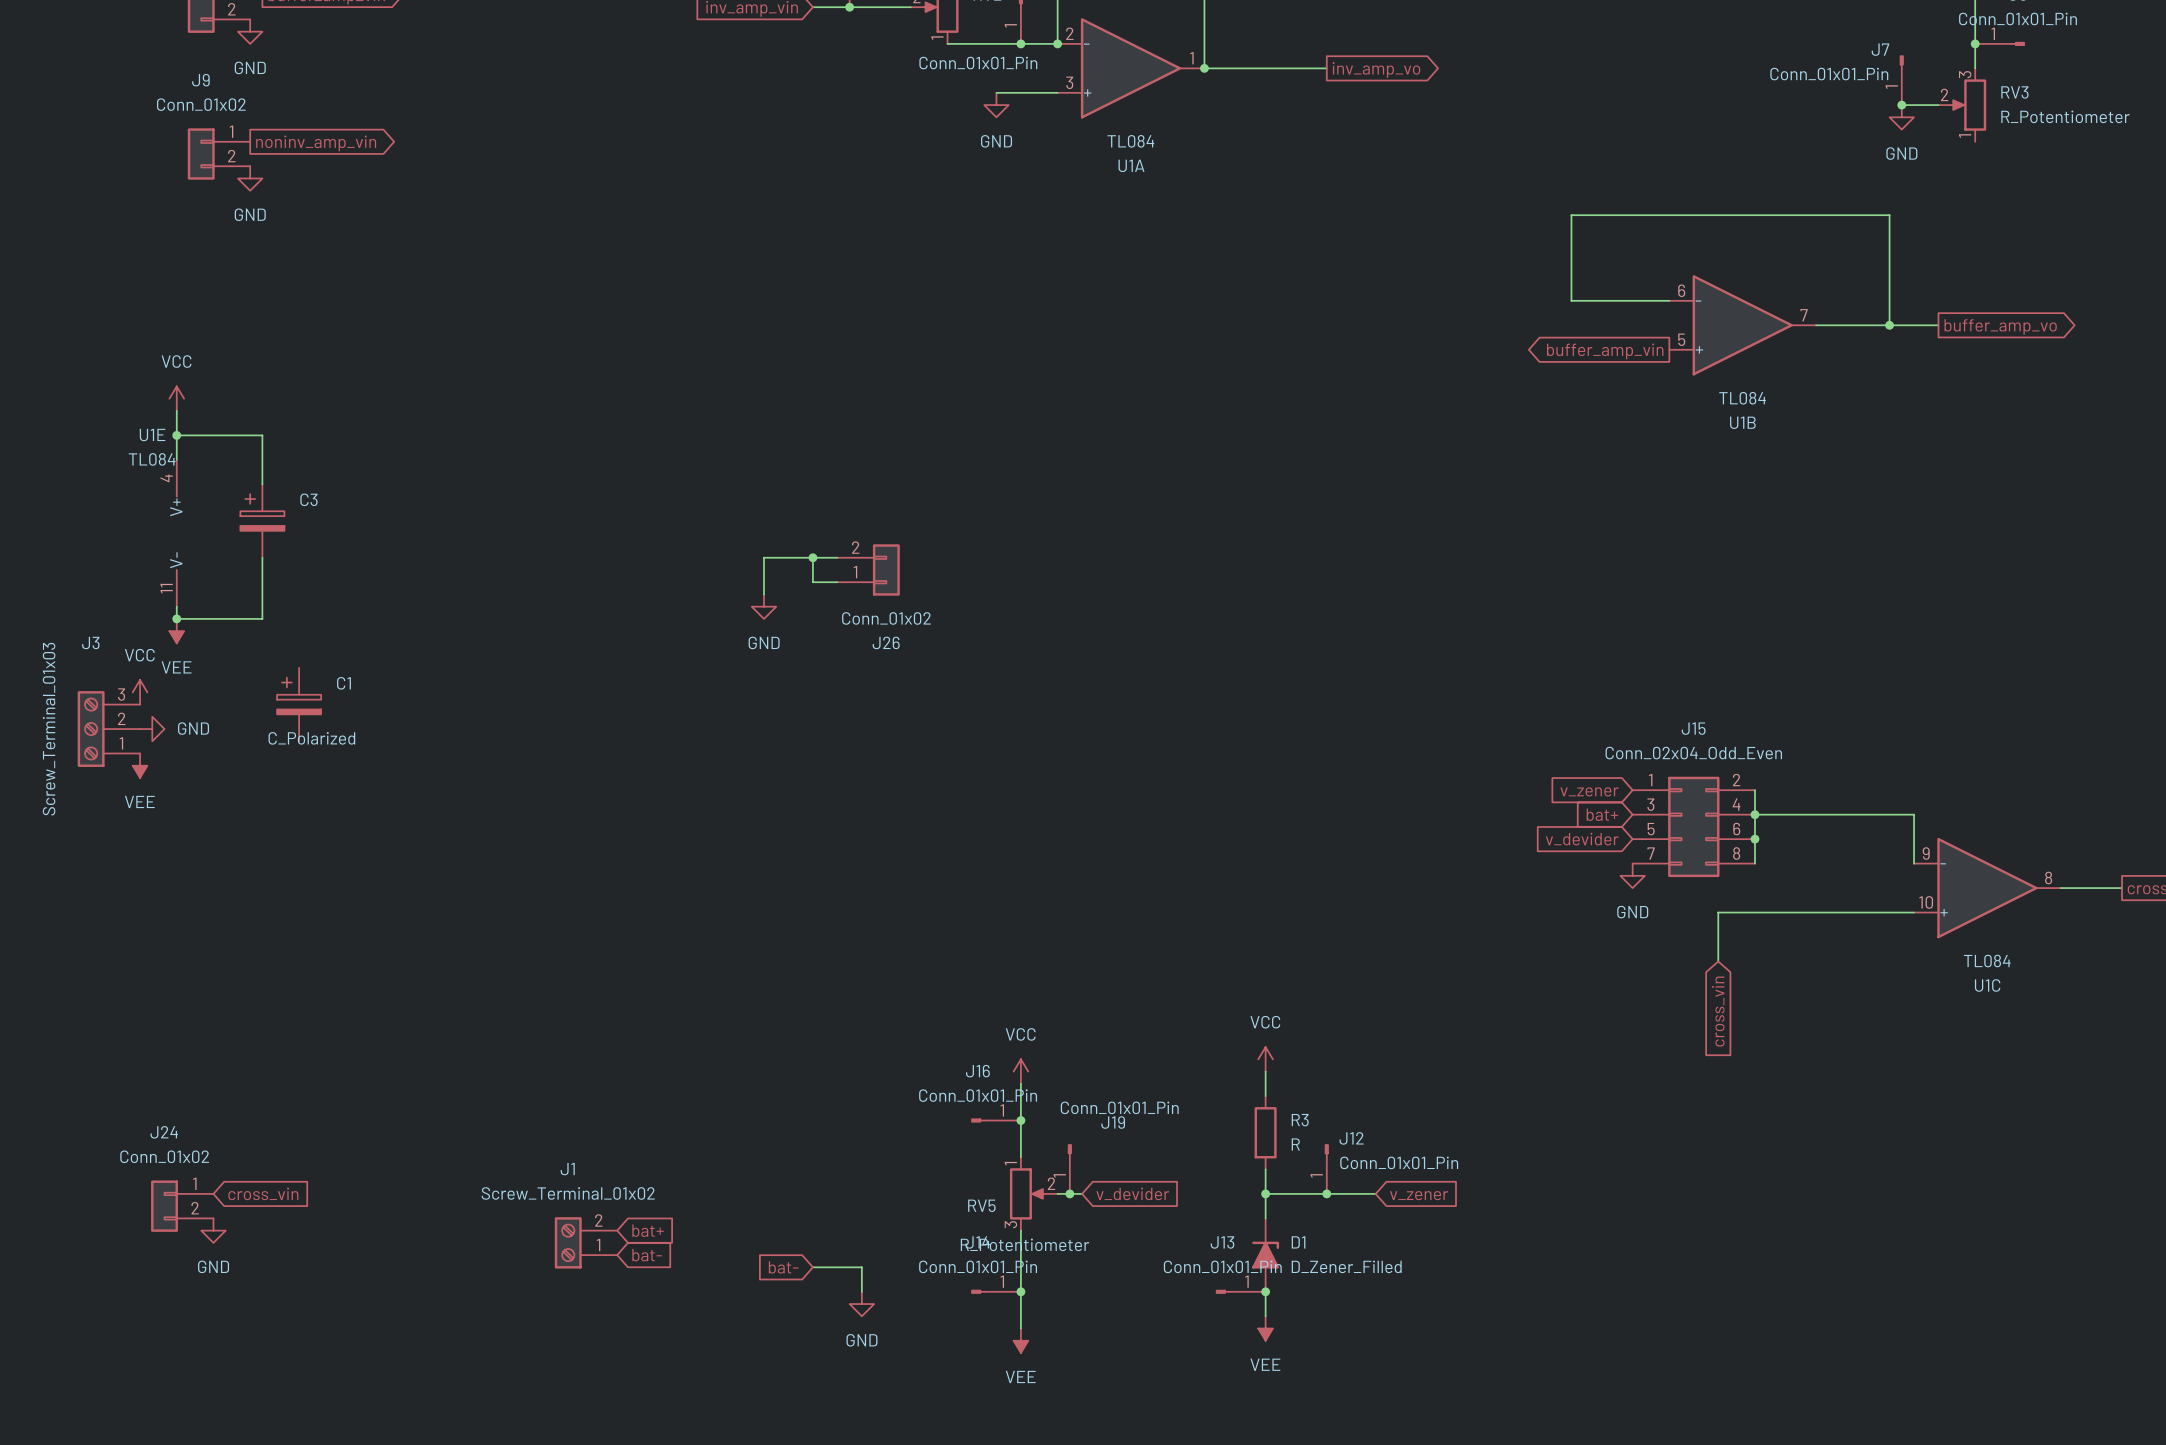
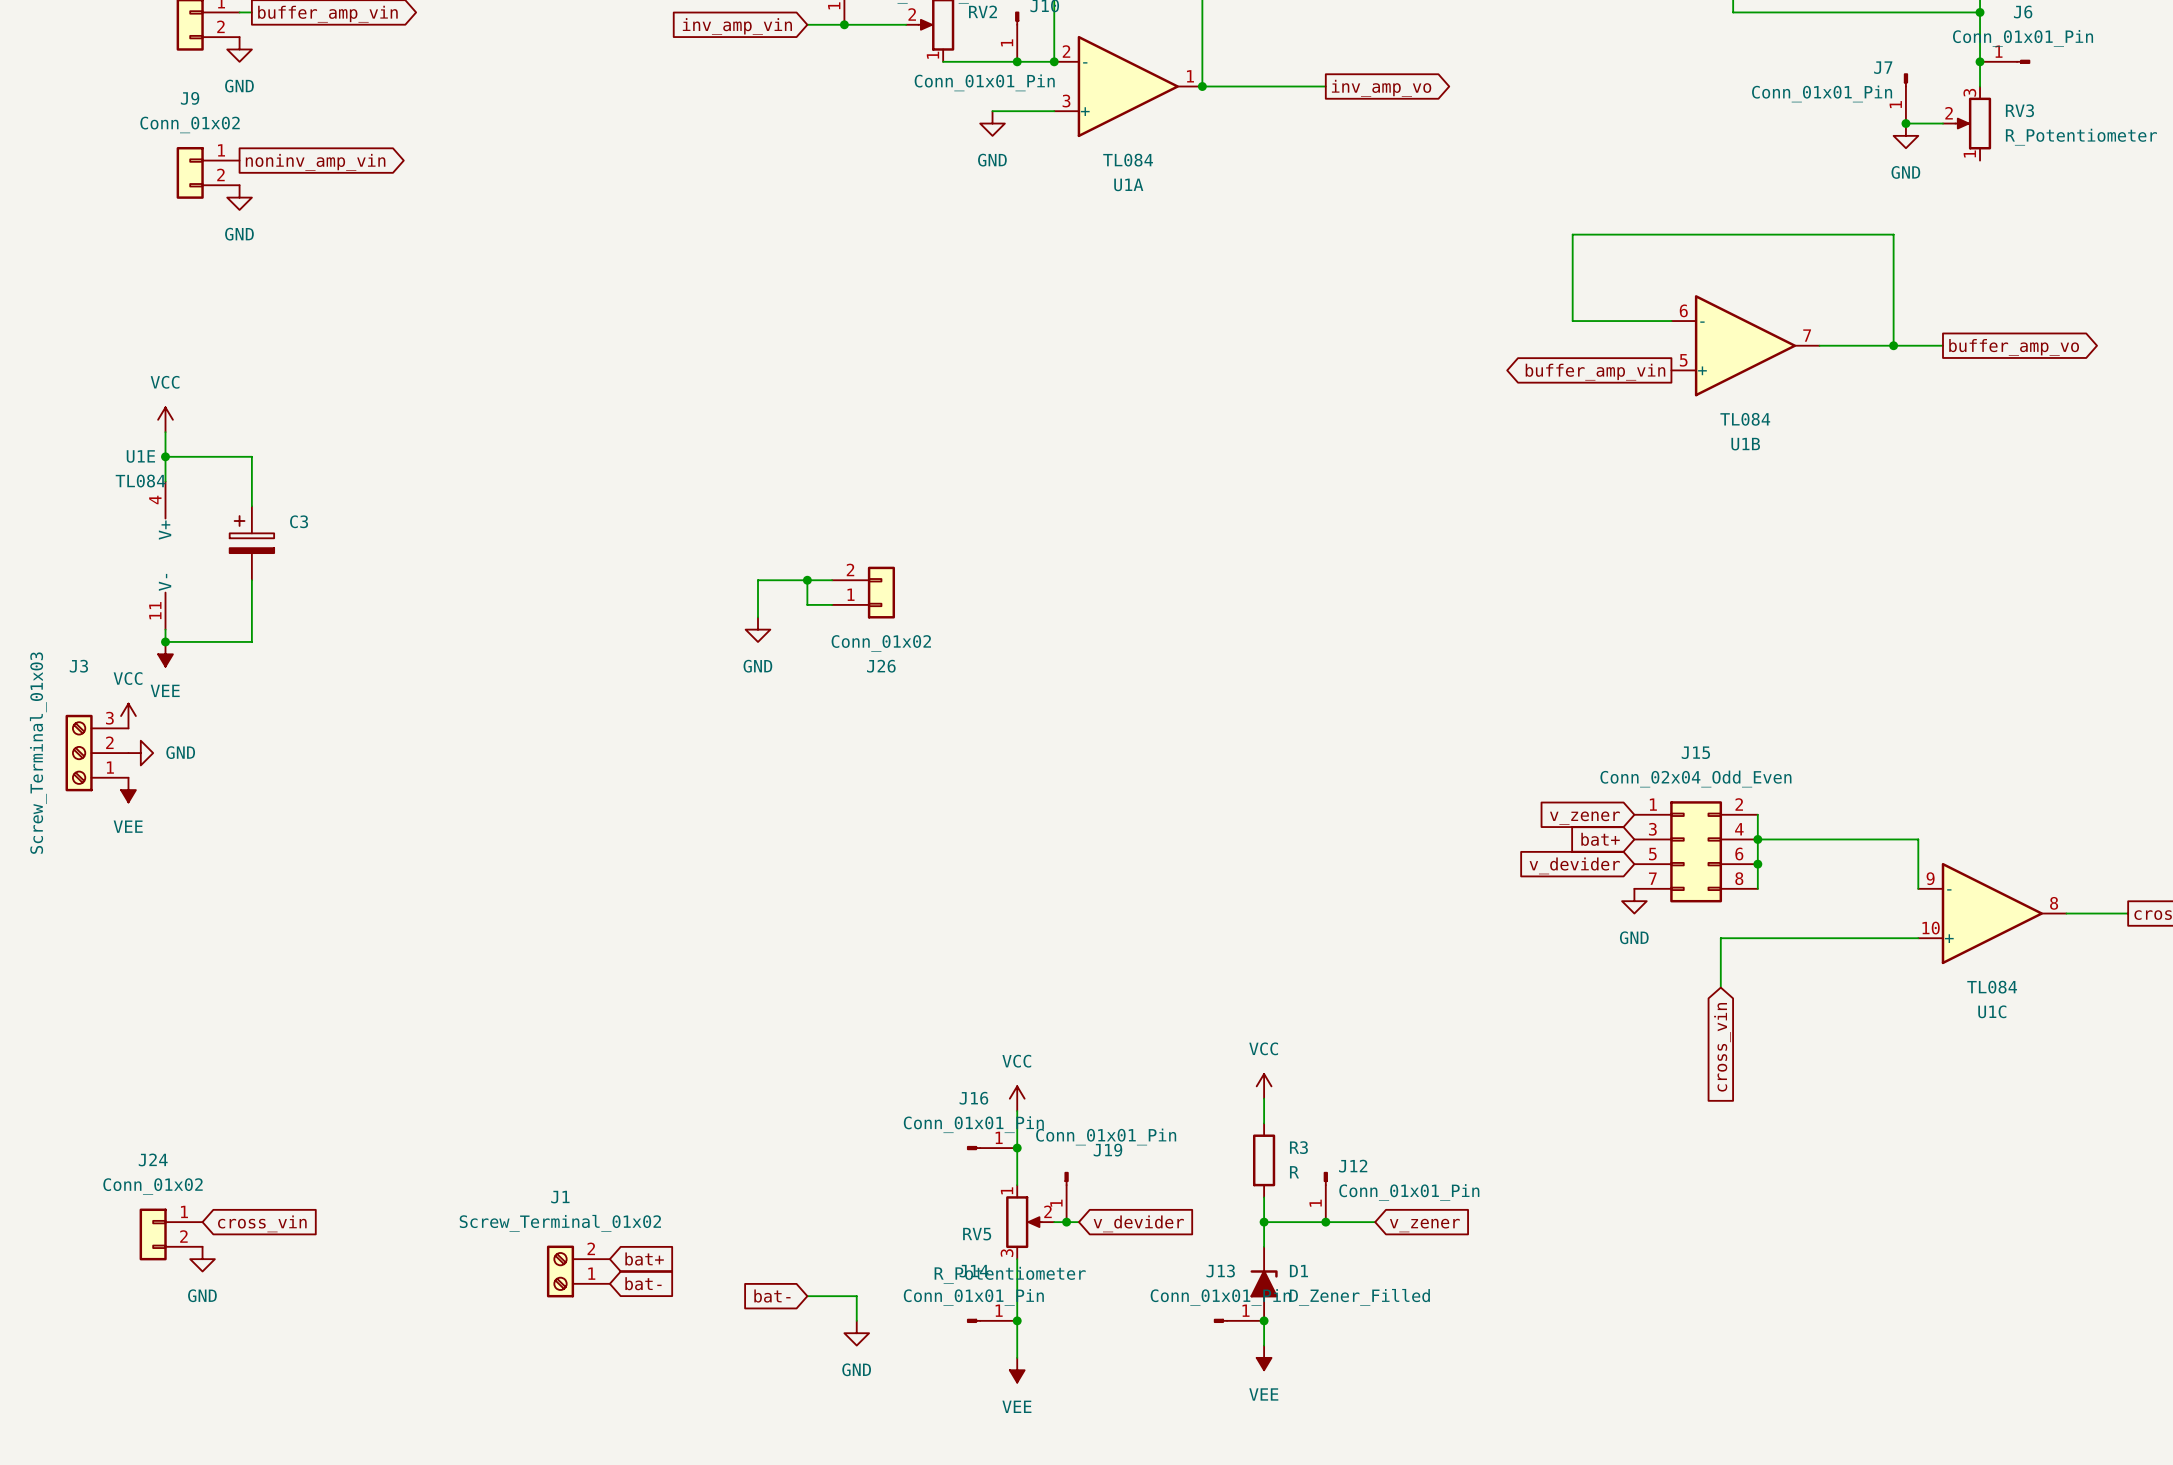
C1: C_Polarized (299, 704) -> none

